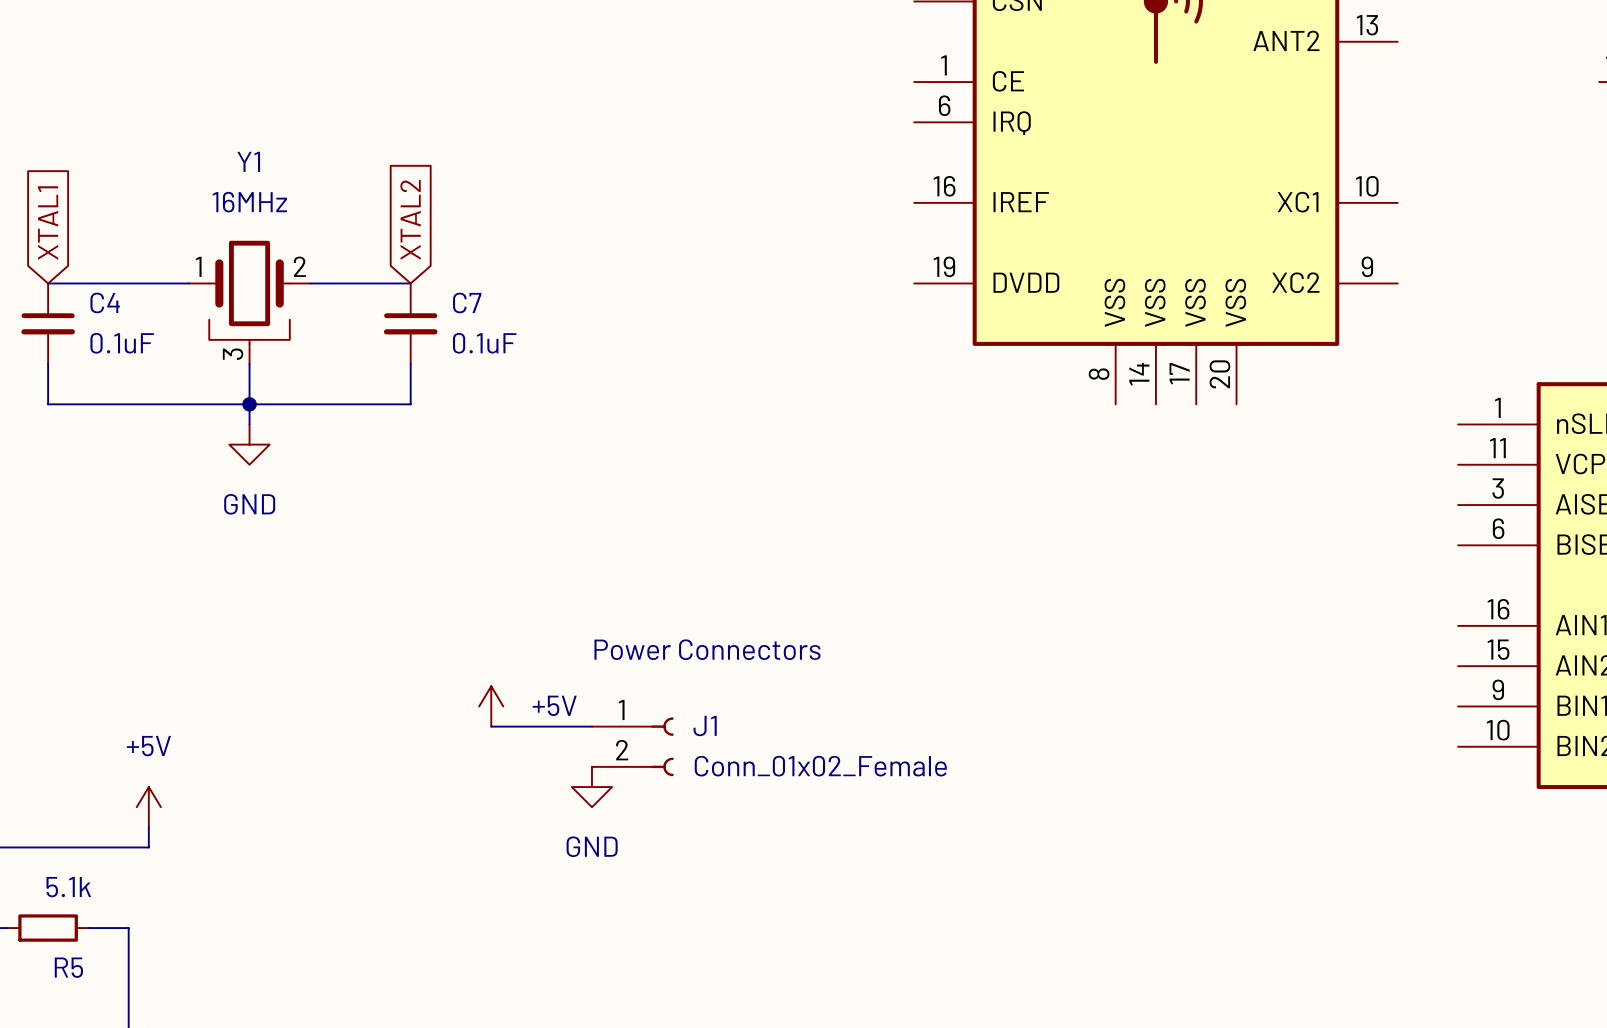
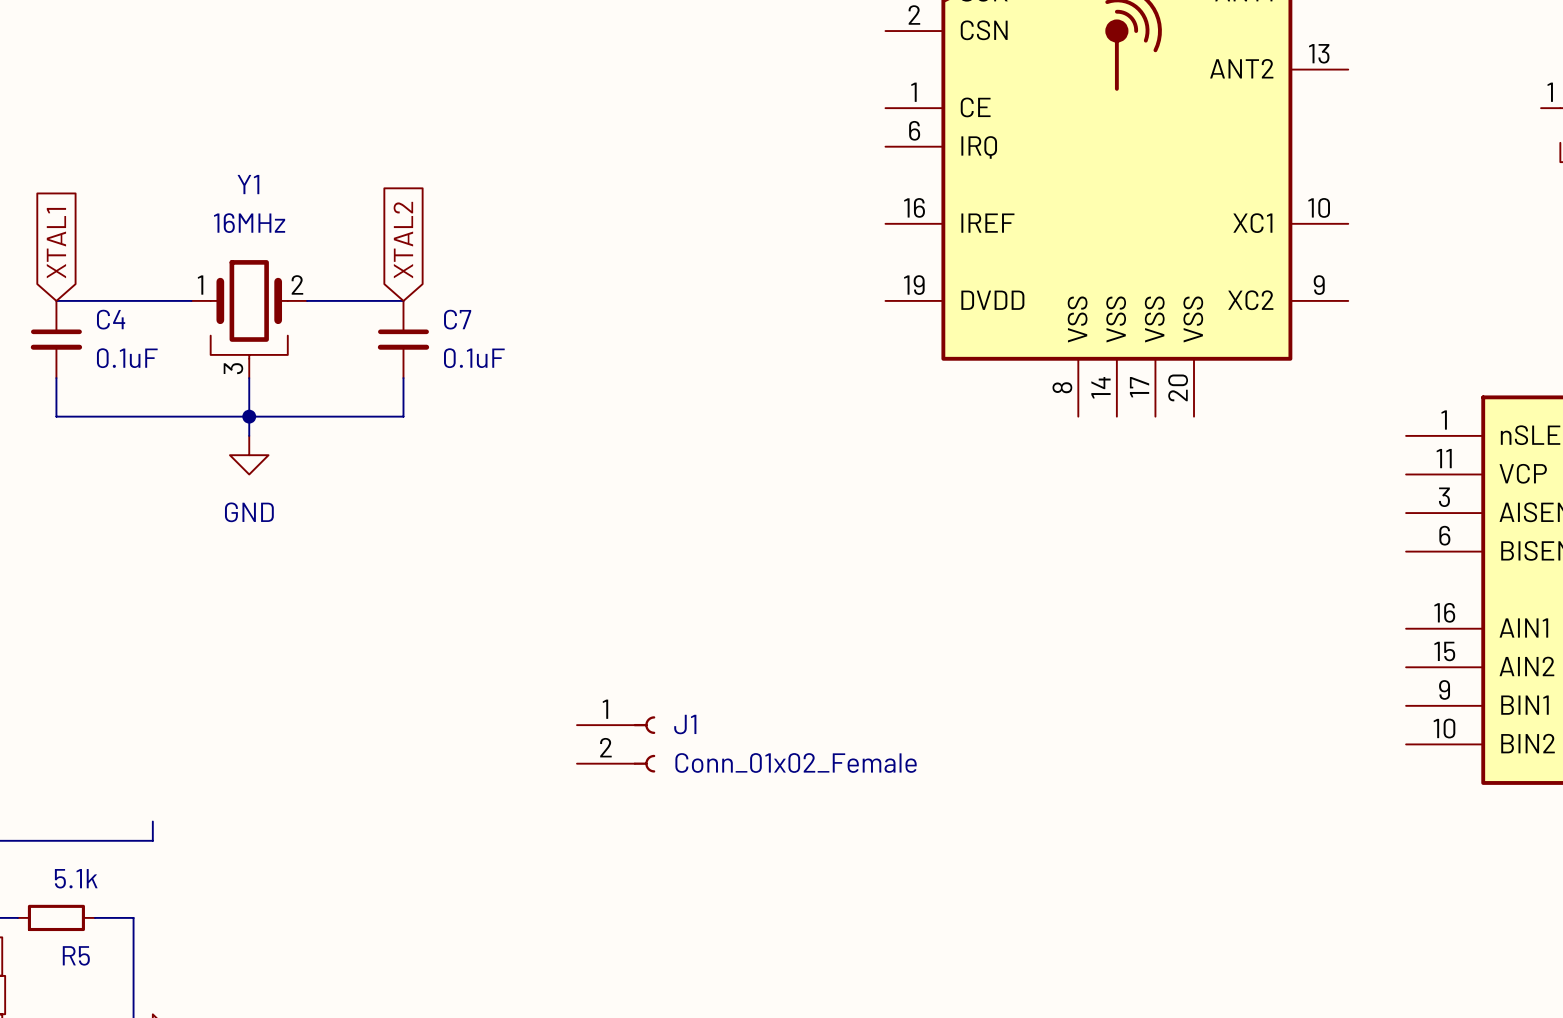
text: Power Connectors (707, 649) -> none
power symbol: +5V (491, 706) -> none
wire: (491, 726) (591, 726) -> none
power symbol: GND (591, 787) -> none
power symbol: +5V (148, 807) -> none

